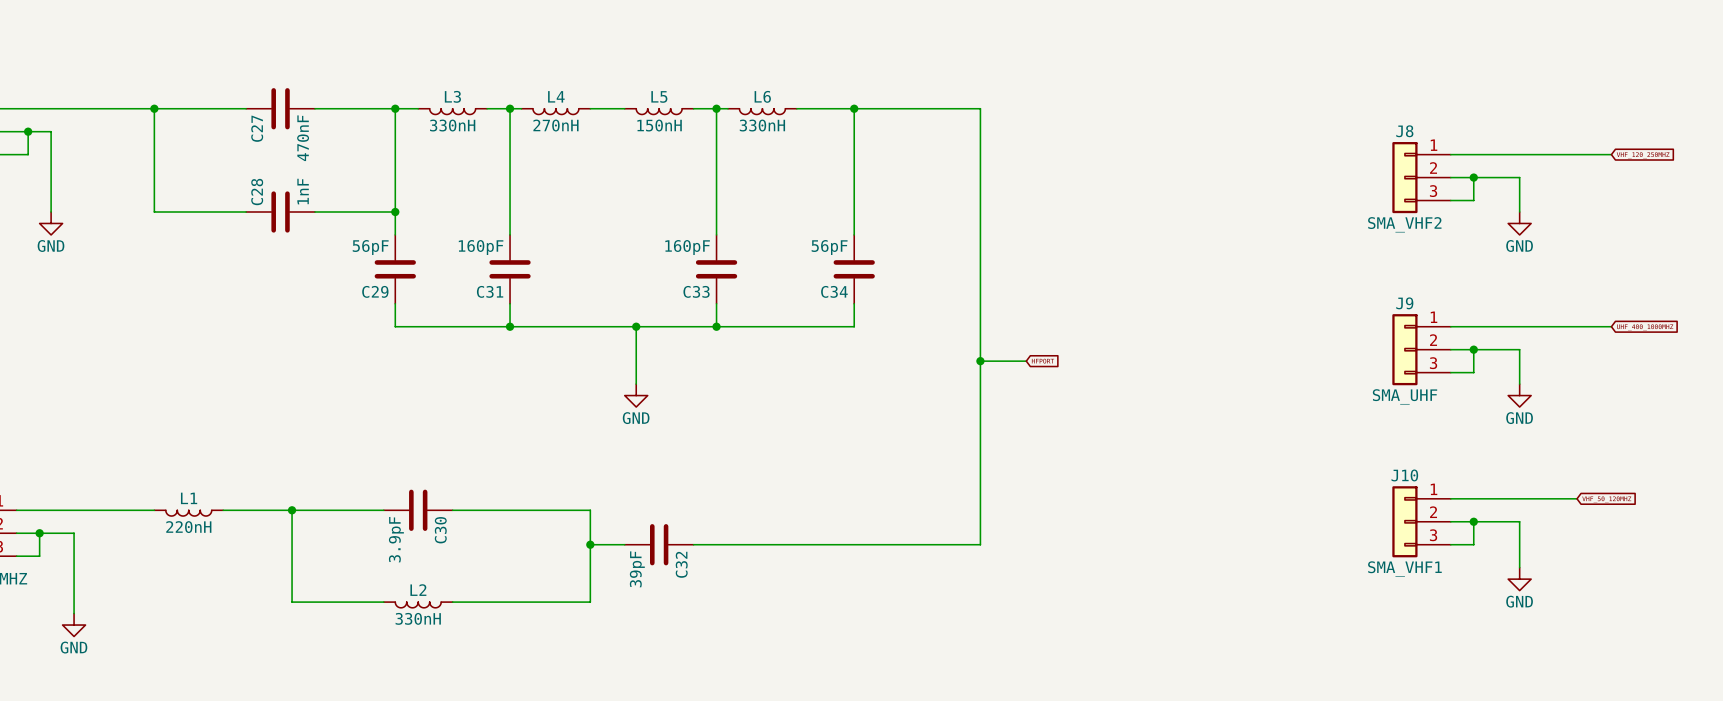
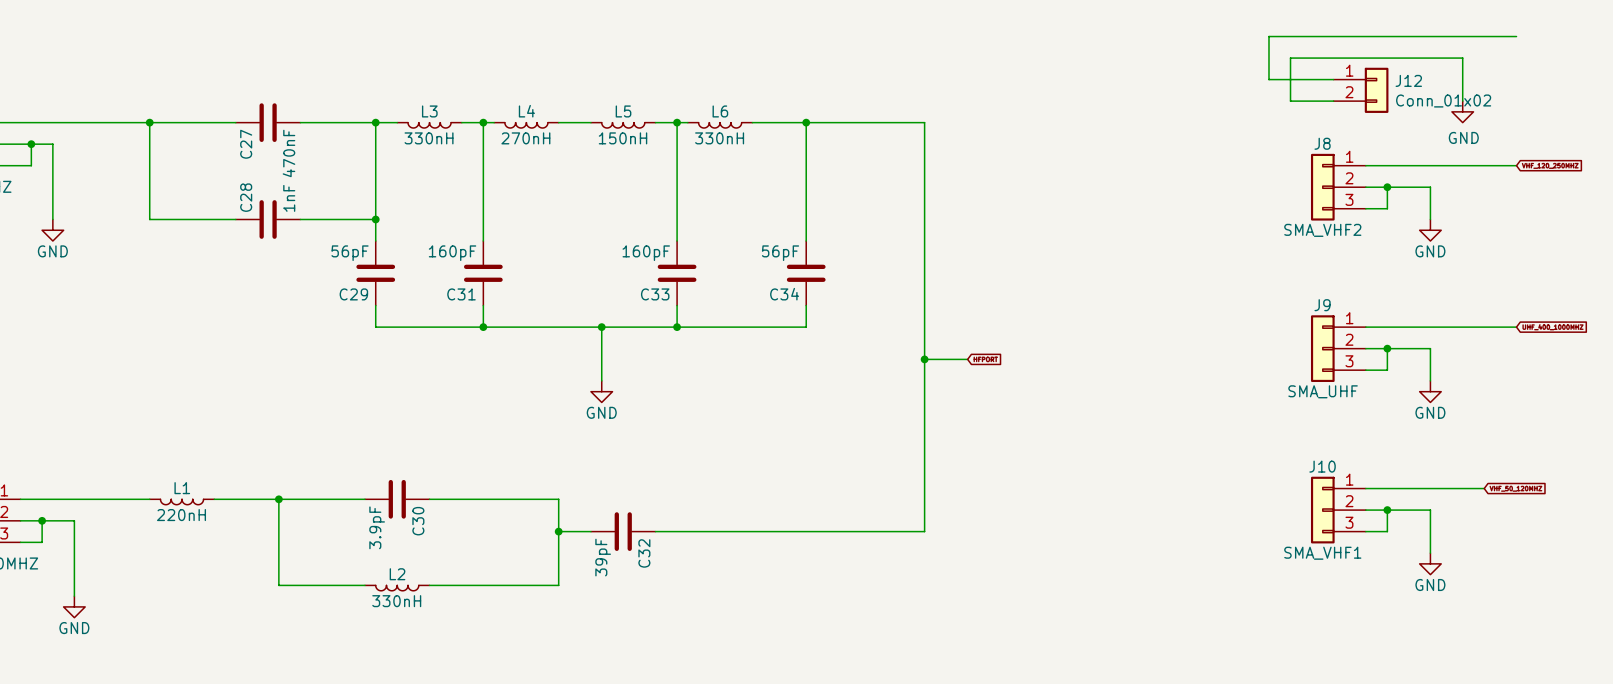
wire: none -> (1516, 36) (1268, 36) (1268, 79) (1333, 79)
J12: none -> Conn_01x02 (1361, 90)
wire: none -> (1333, 101) (1290, 101) (1290, 58) (1462, 58) (1462, 101)
power symbol: none -> GND (1462, 111)

